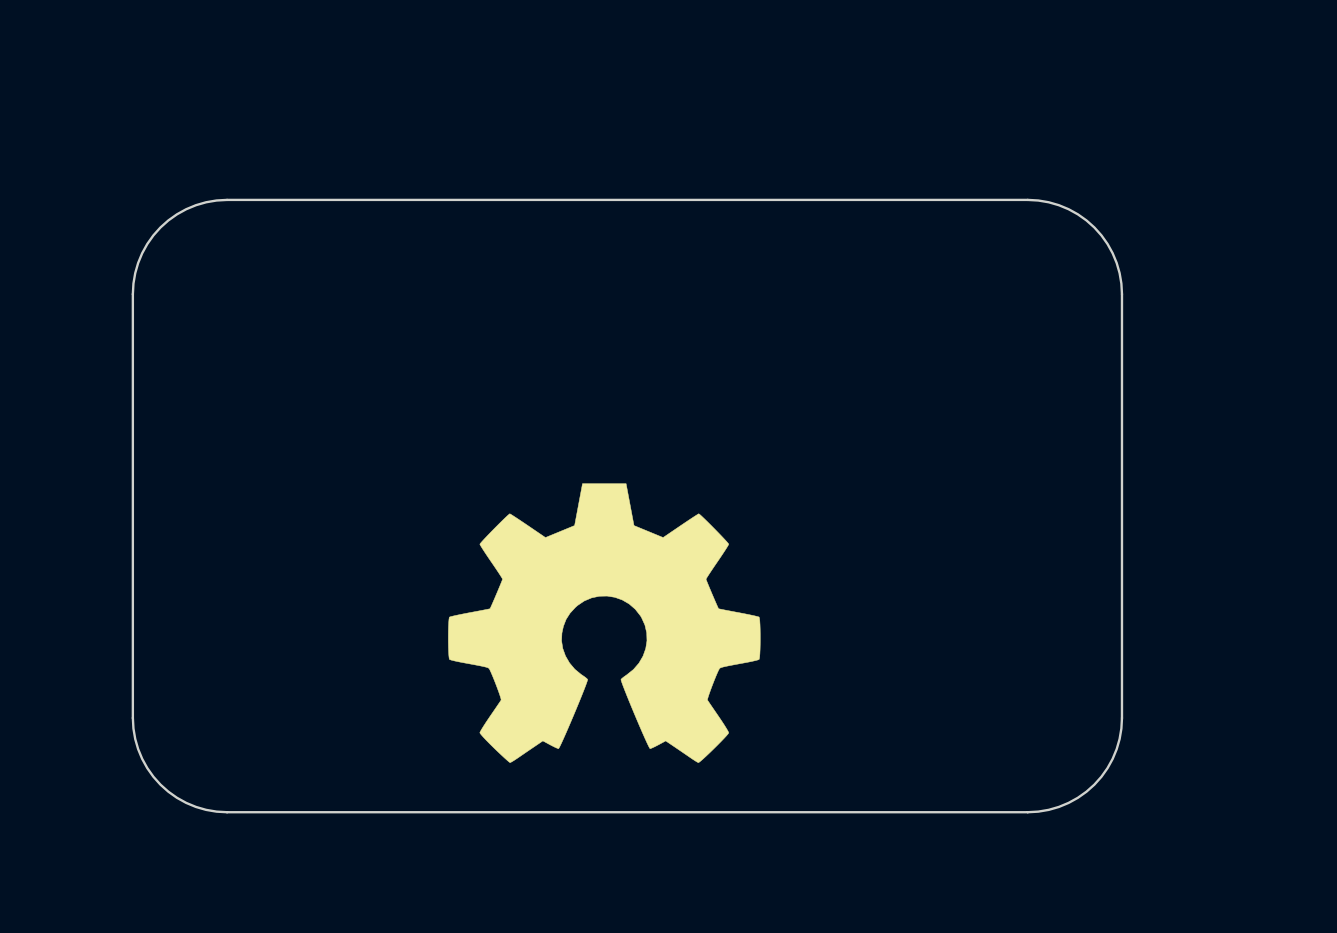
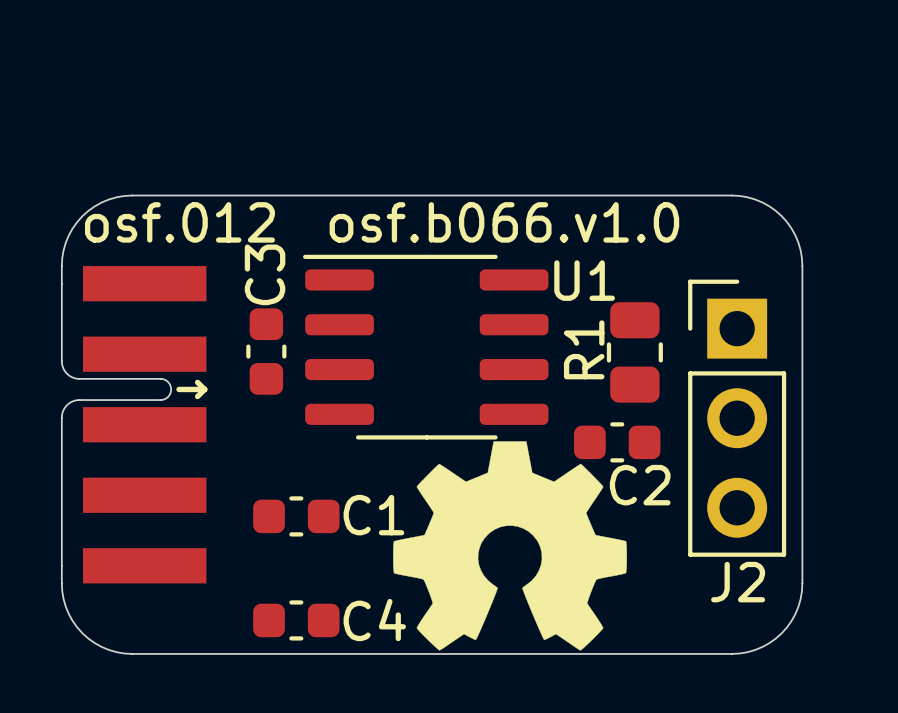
text: none -> osf.012 (179, 222)
text: none -> osf.b066.v1.0 (504, 222)
board edge: (132, 317) (132, 694) -> none
U1: none -> (425, 347)
C3: none -> (266, 351)
R1: none -> (634, 352)
J2: none -> (737, 418)
part: none -> (134, 424)
C2: none -> (617, 442)
drawing position: (604, 623) -> (510, 545)
C1: none -> (296, 516)
C4: none -> (296, 620)

